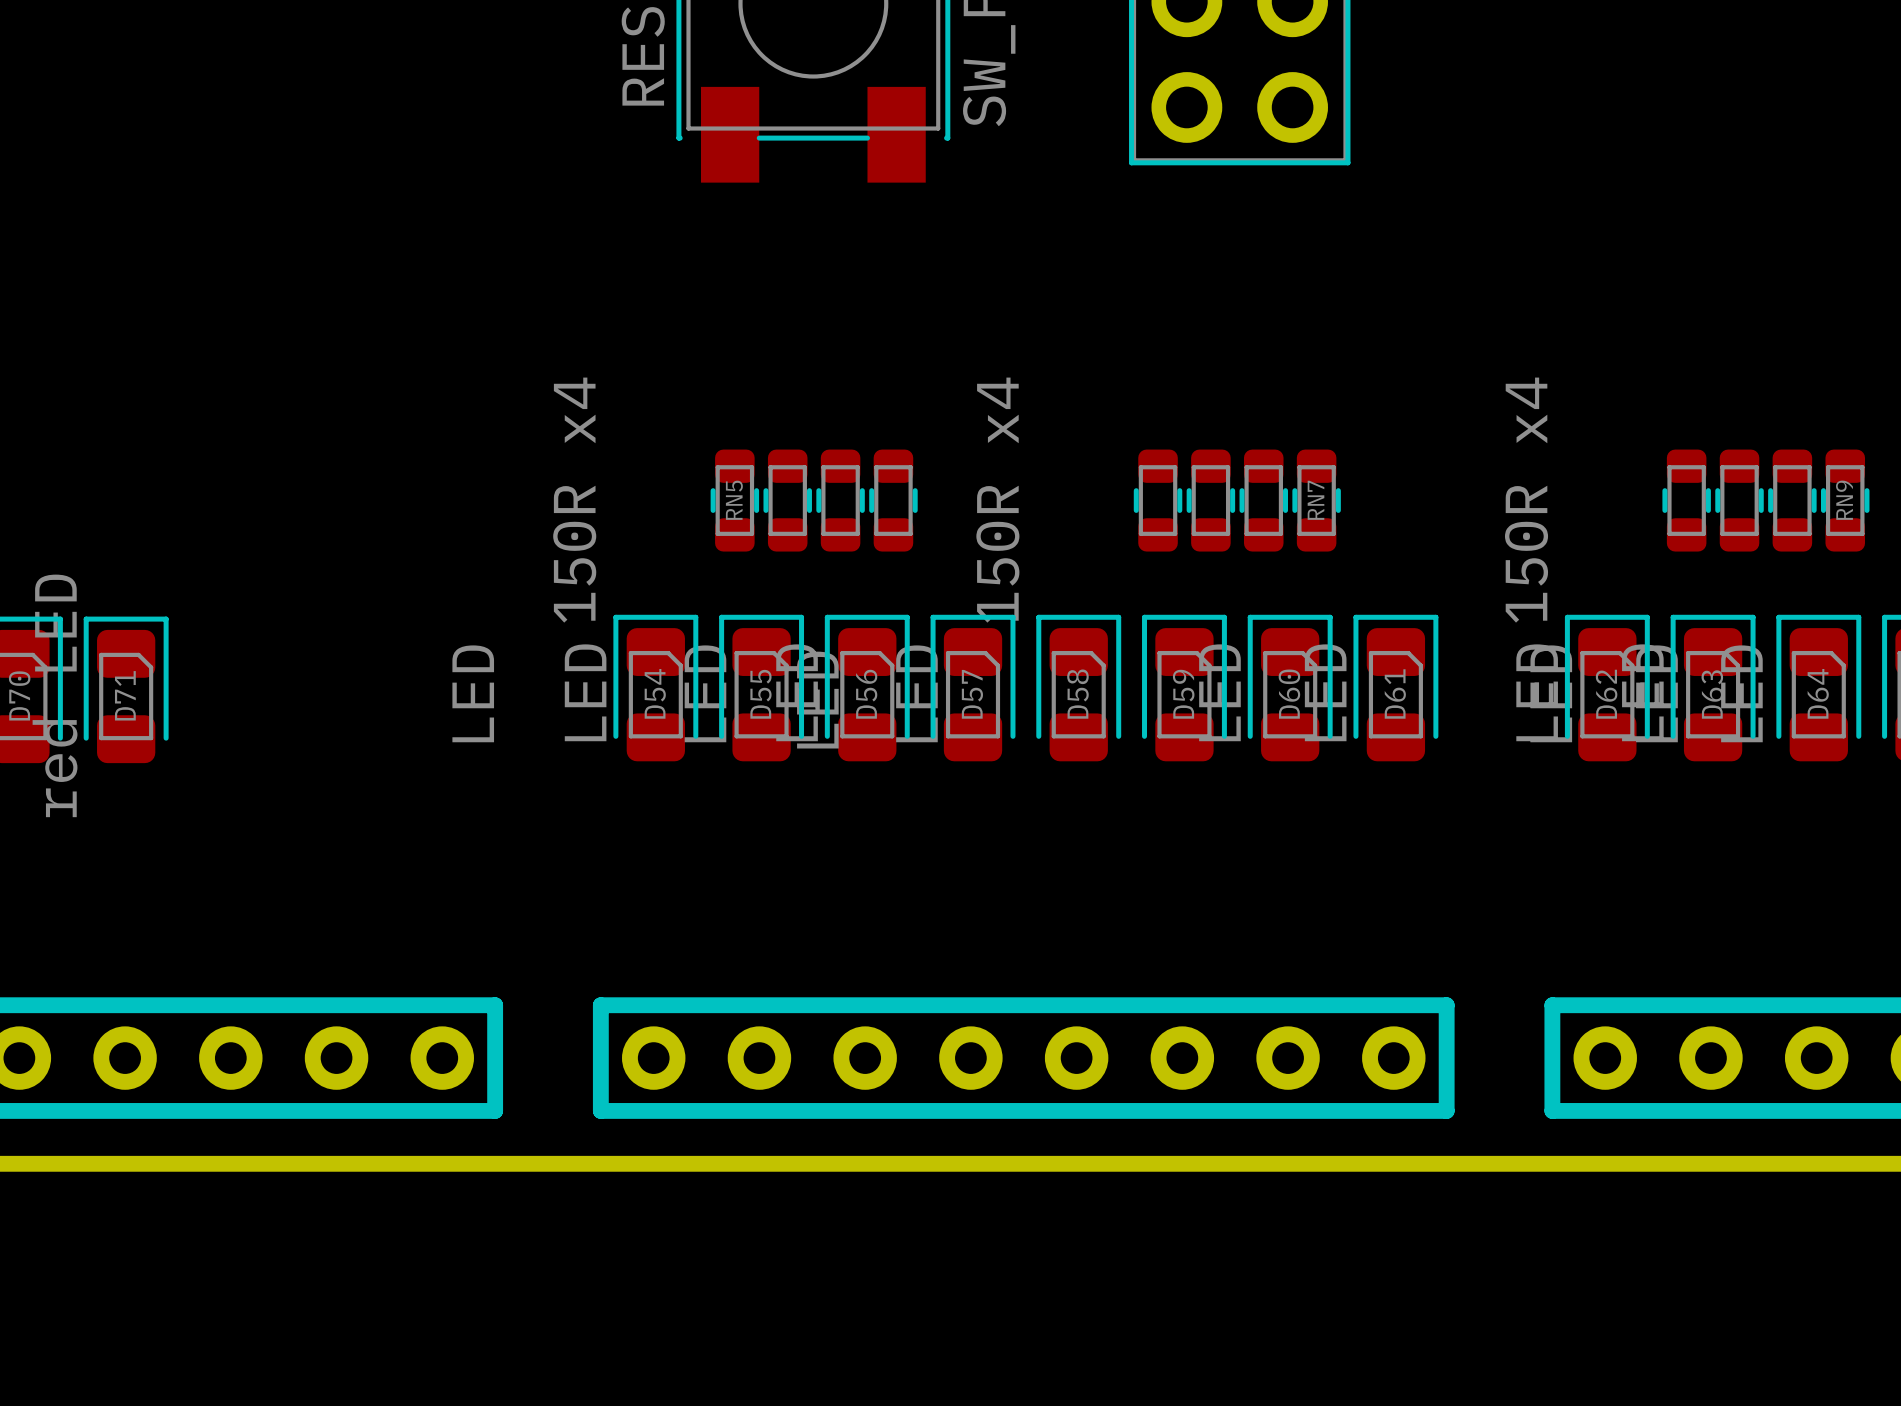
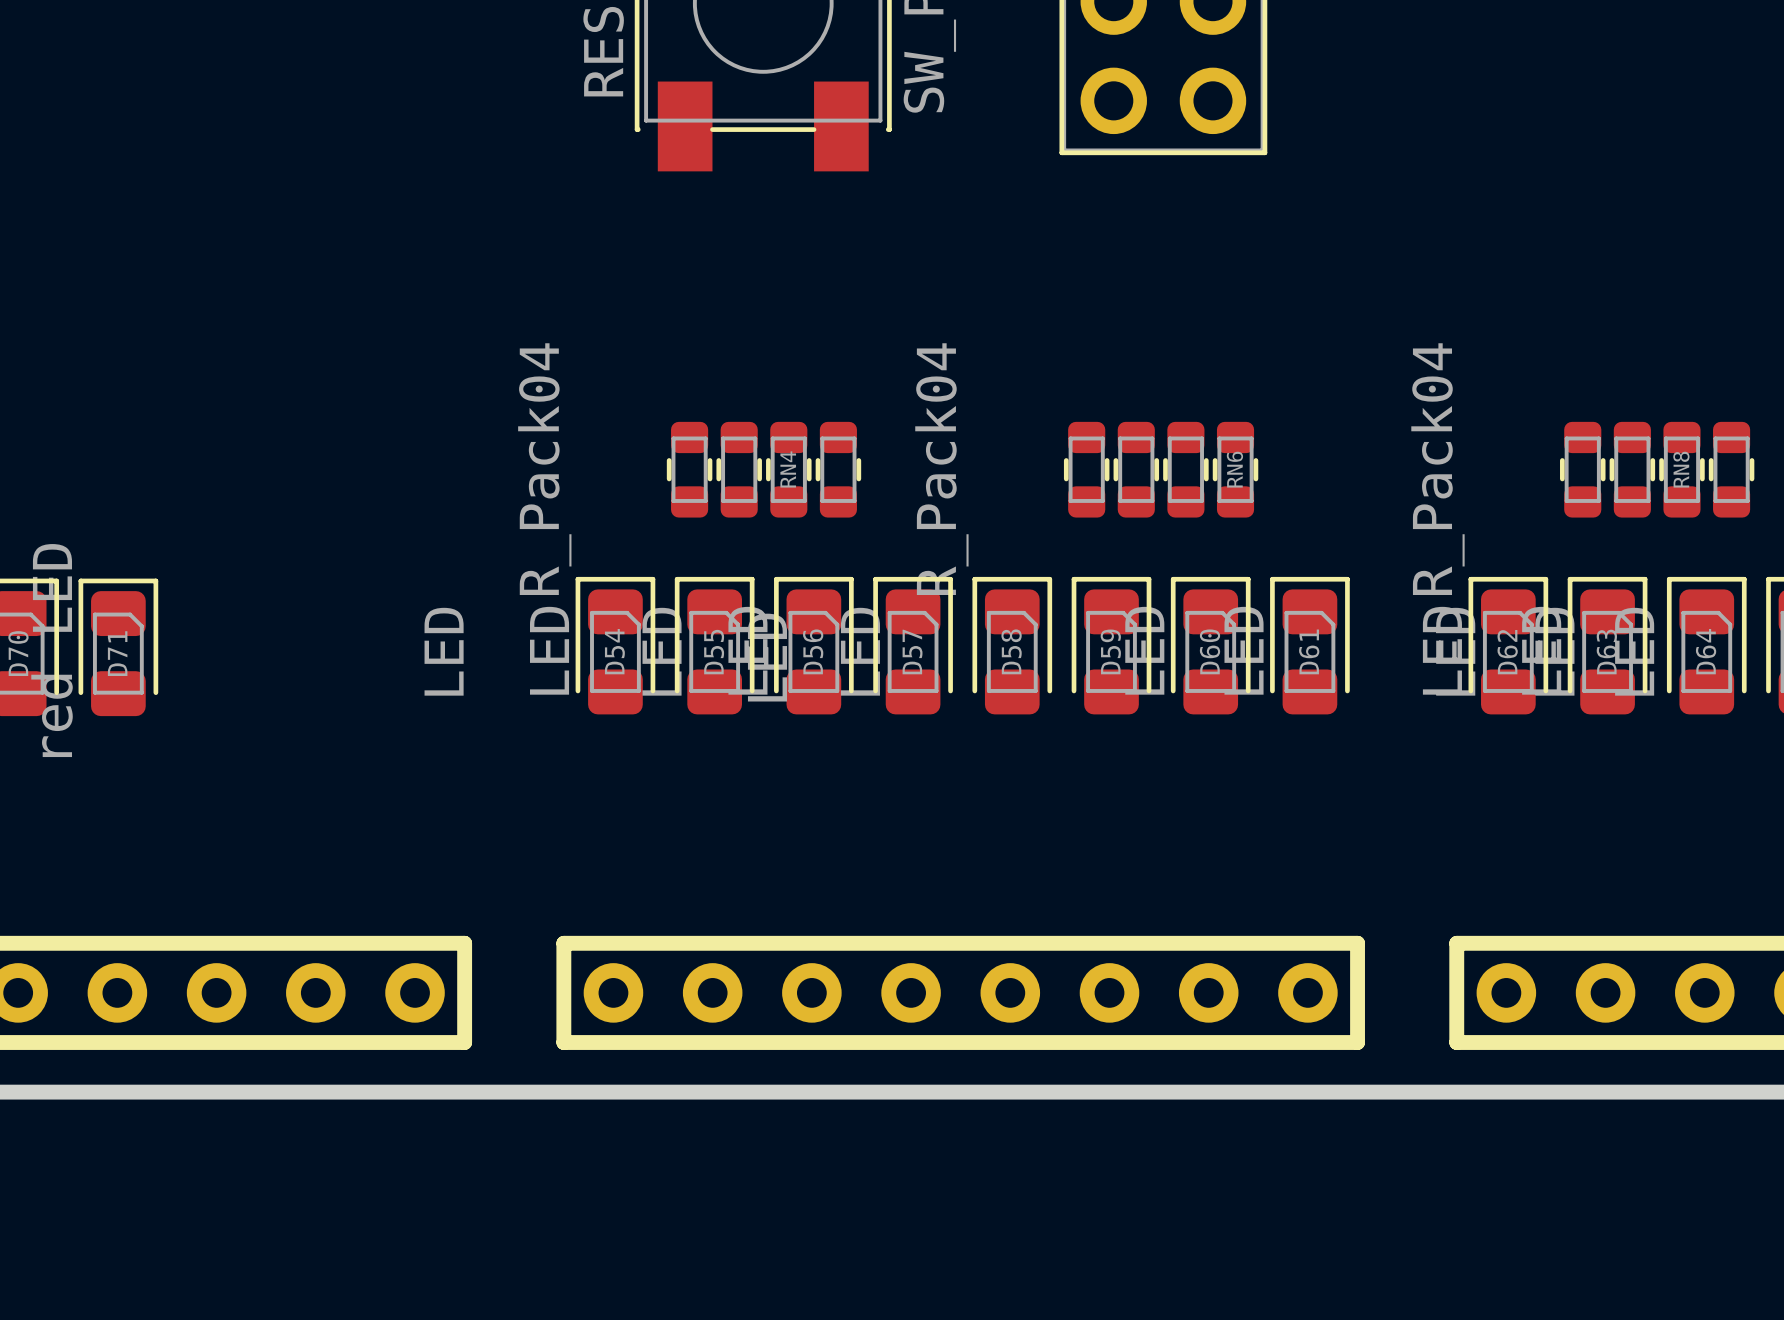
RN5 value: 150R x4 (574, 500) -> R_Pack04 (544, 469)
RN5 name: RN5 (734, 500) -> RN4 (788, 469)
RN7 value: 150R x4 (997, 500) -> R_Pack04 (941, 469)
RN7 name: RN7 (1315, 500) -> RN6 (1234, 469)
RN9 value: 150R x4 (1526, 500) -> R_Pack04 (1437, 469)
RN9 name: RN9 (1844, 500) -> RN8 (1681, 469)

